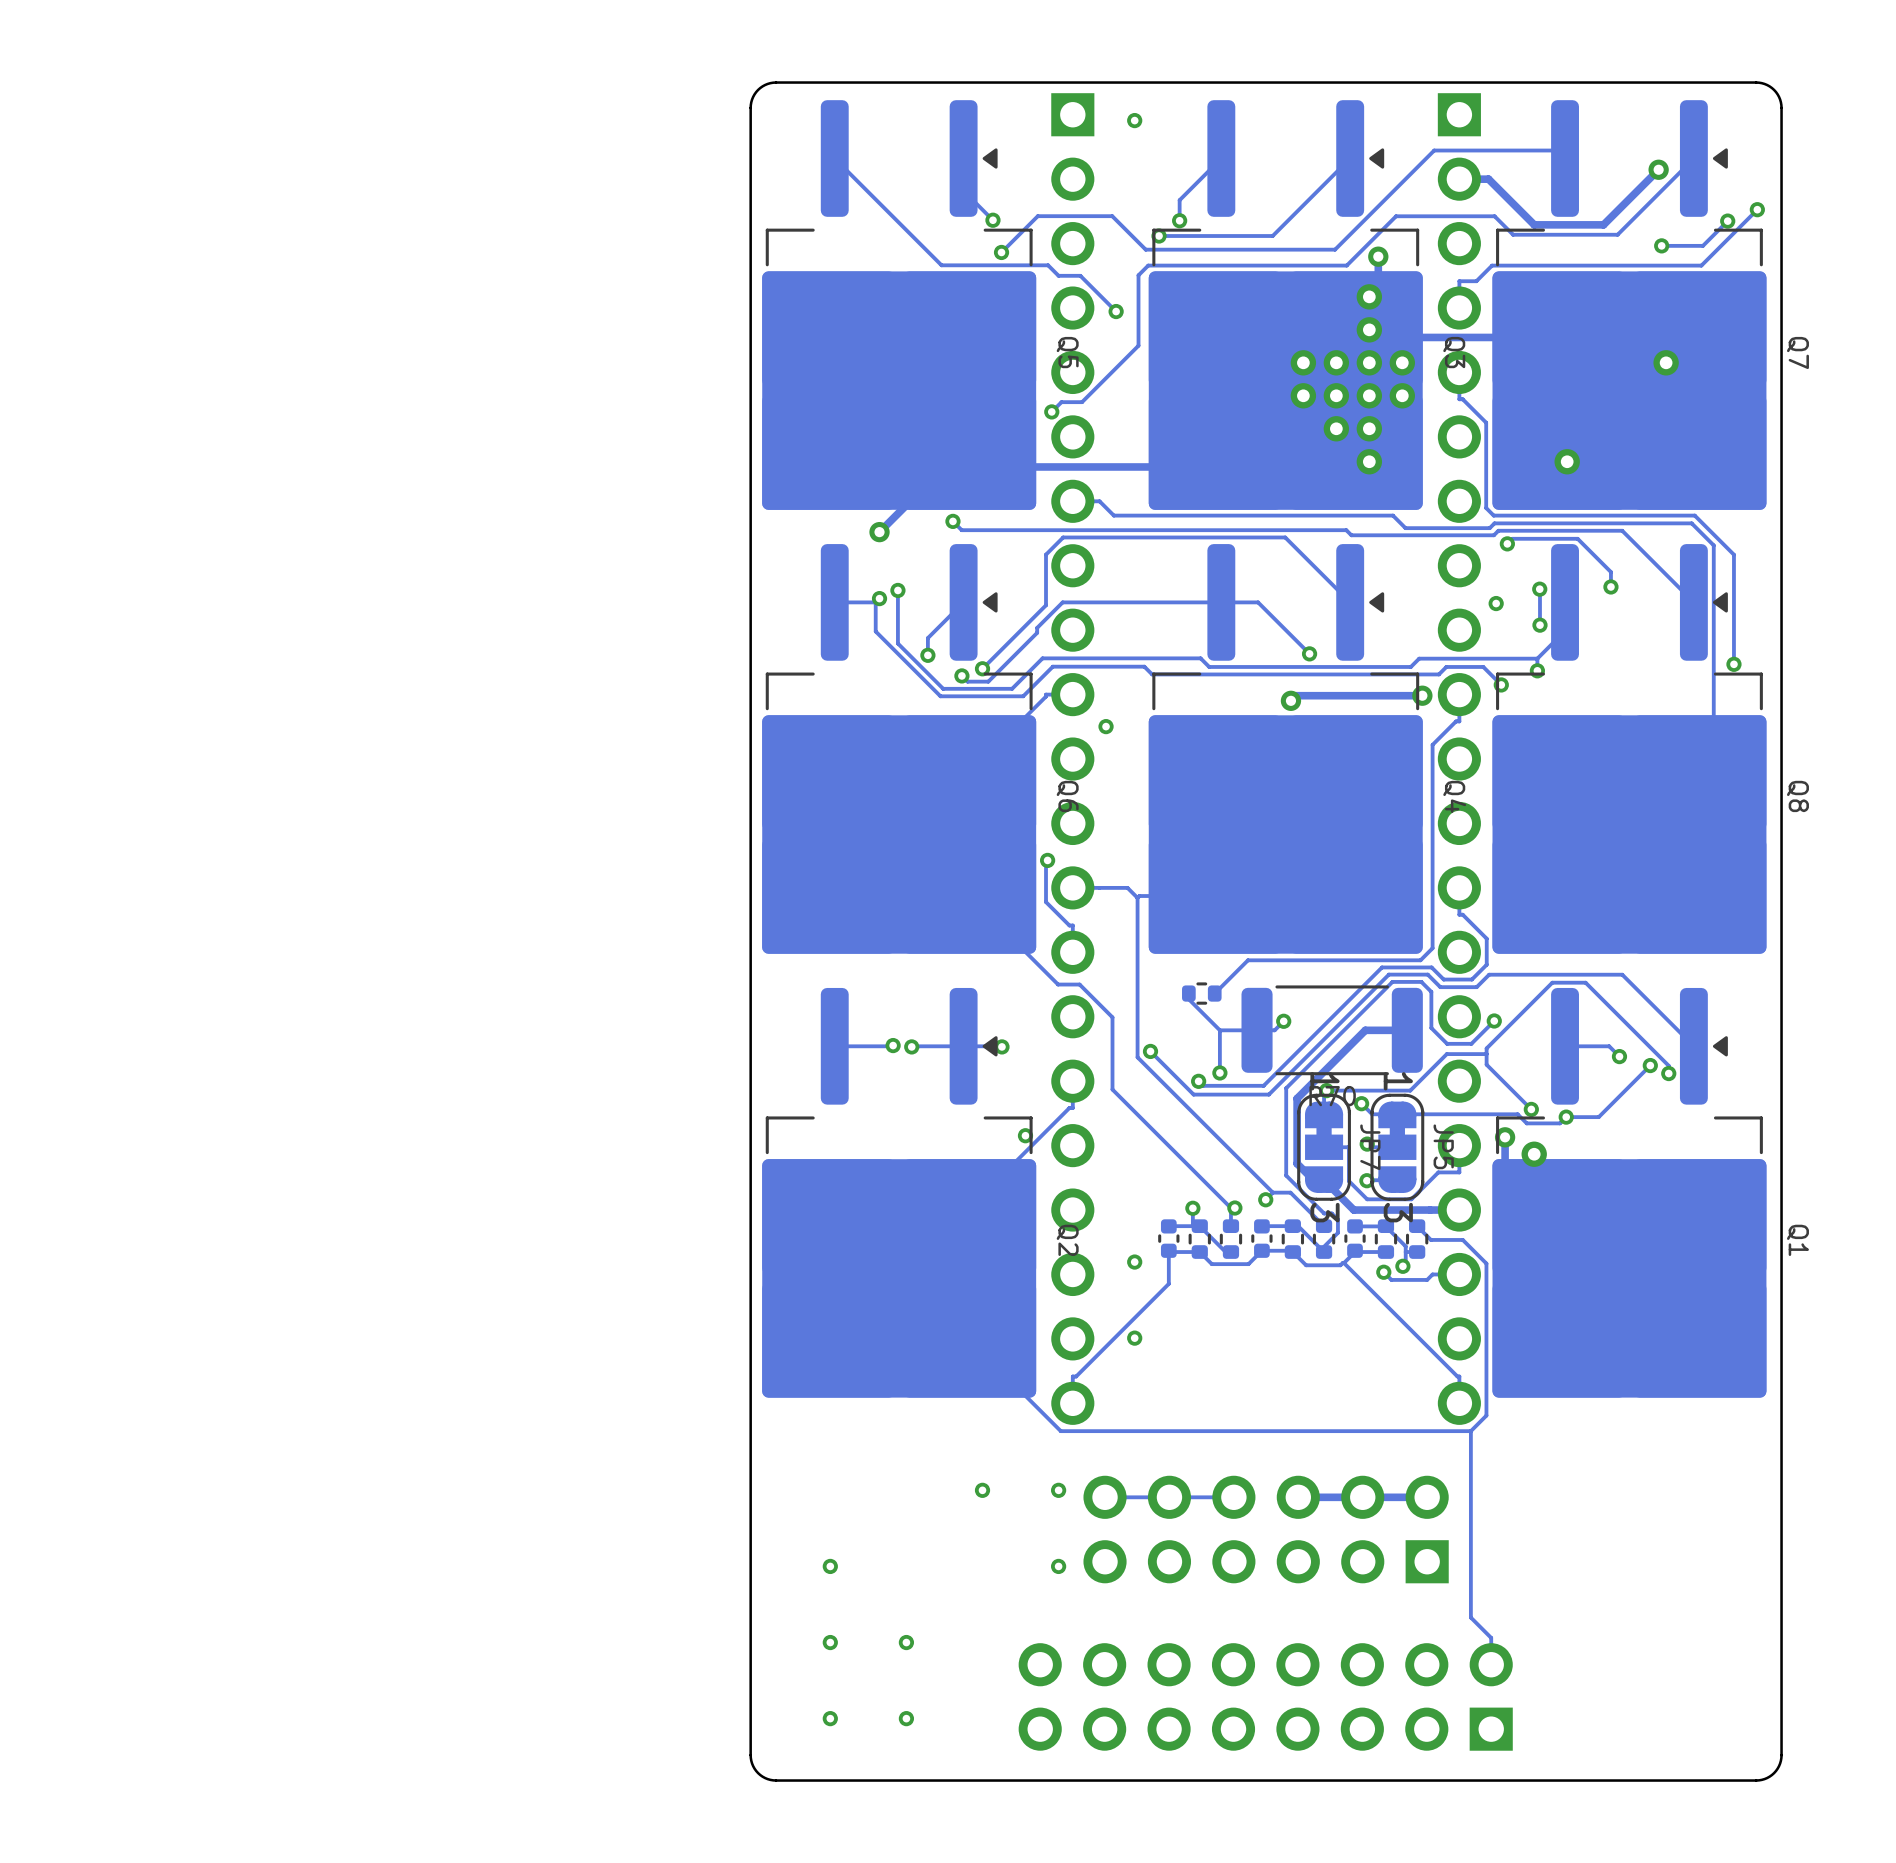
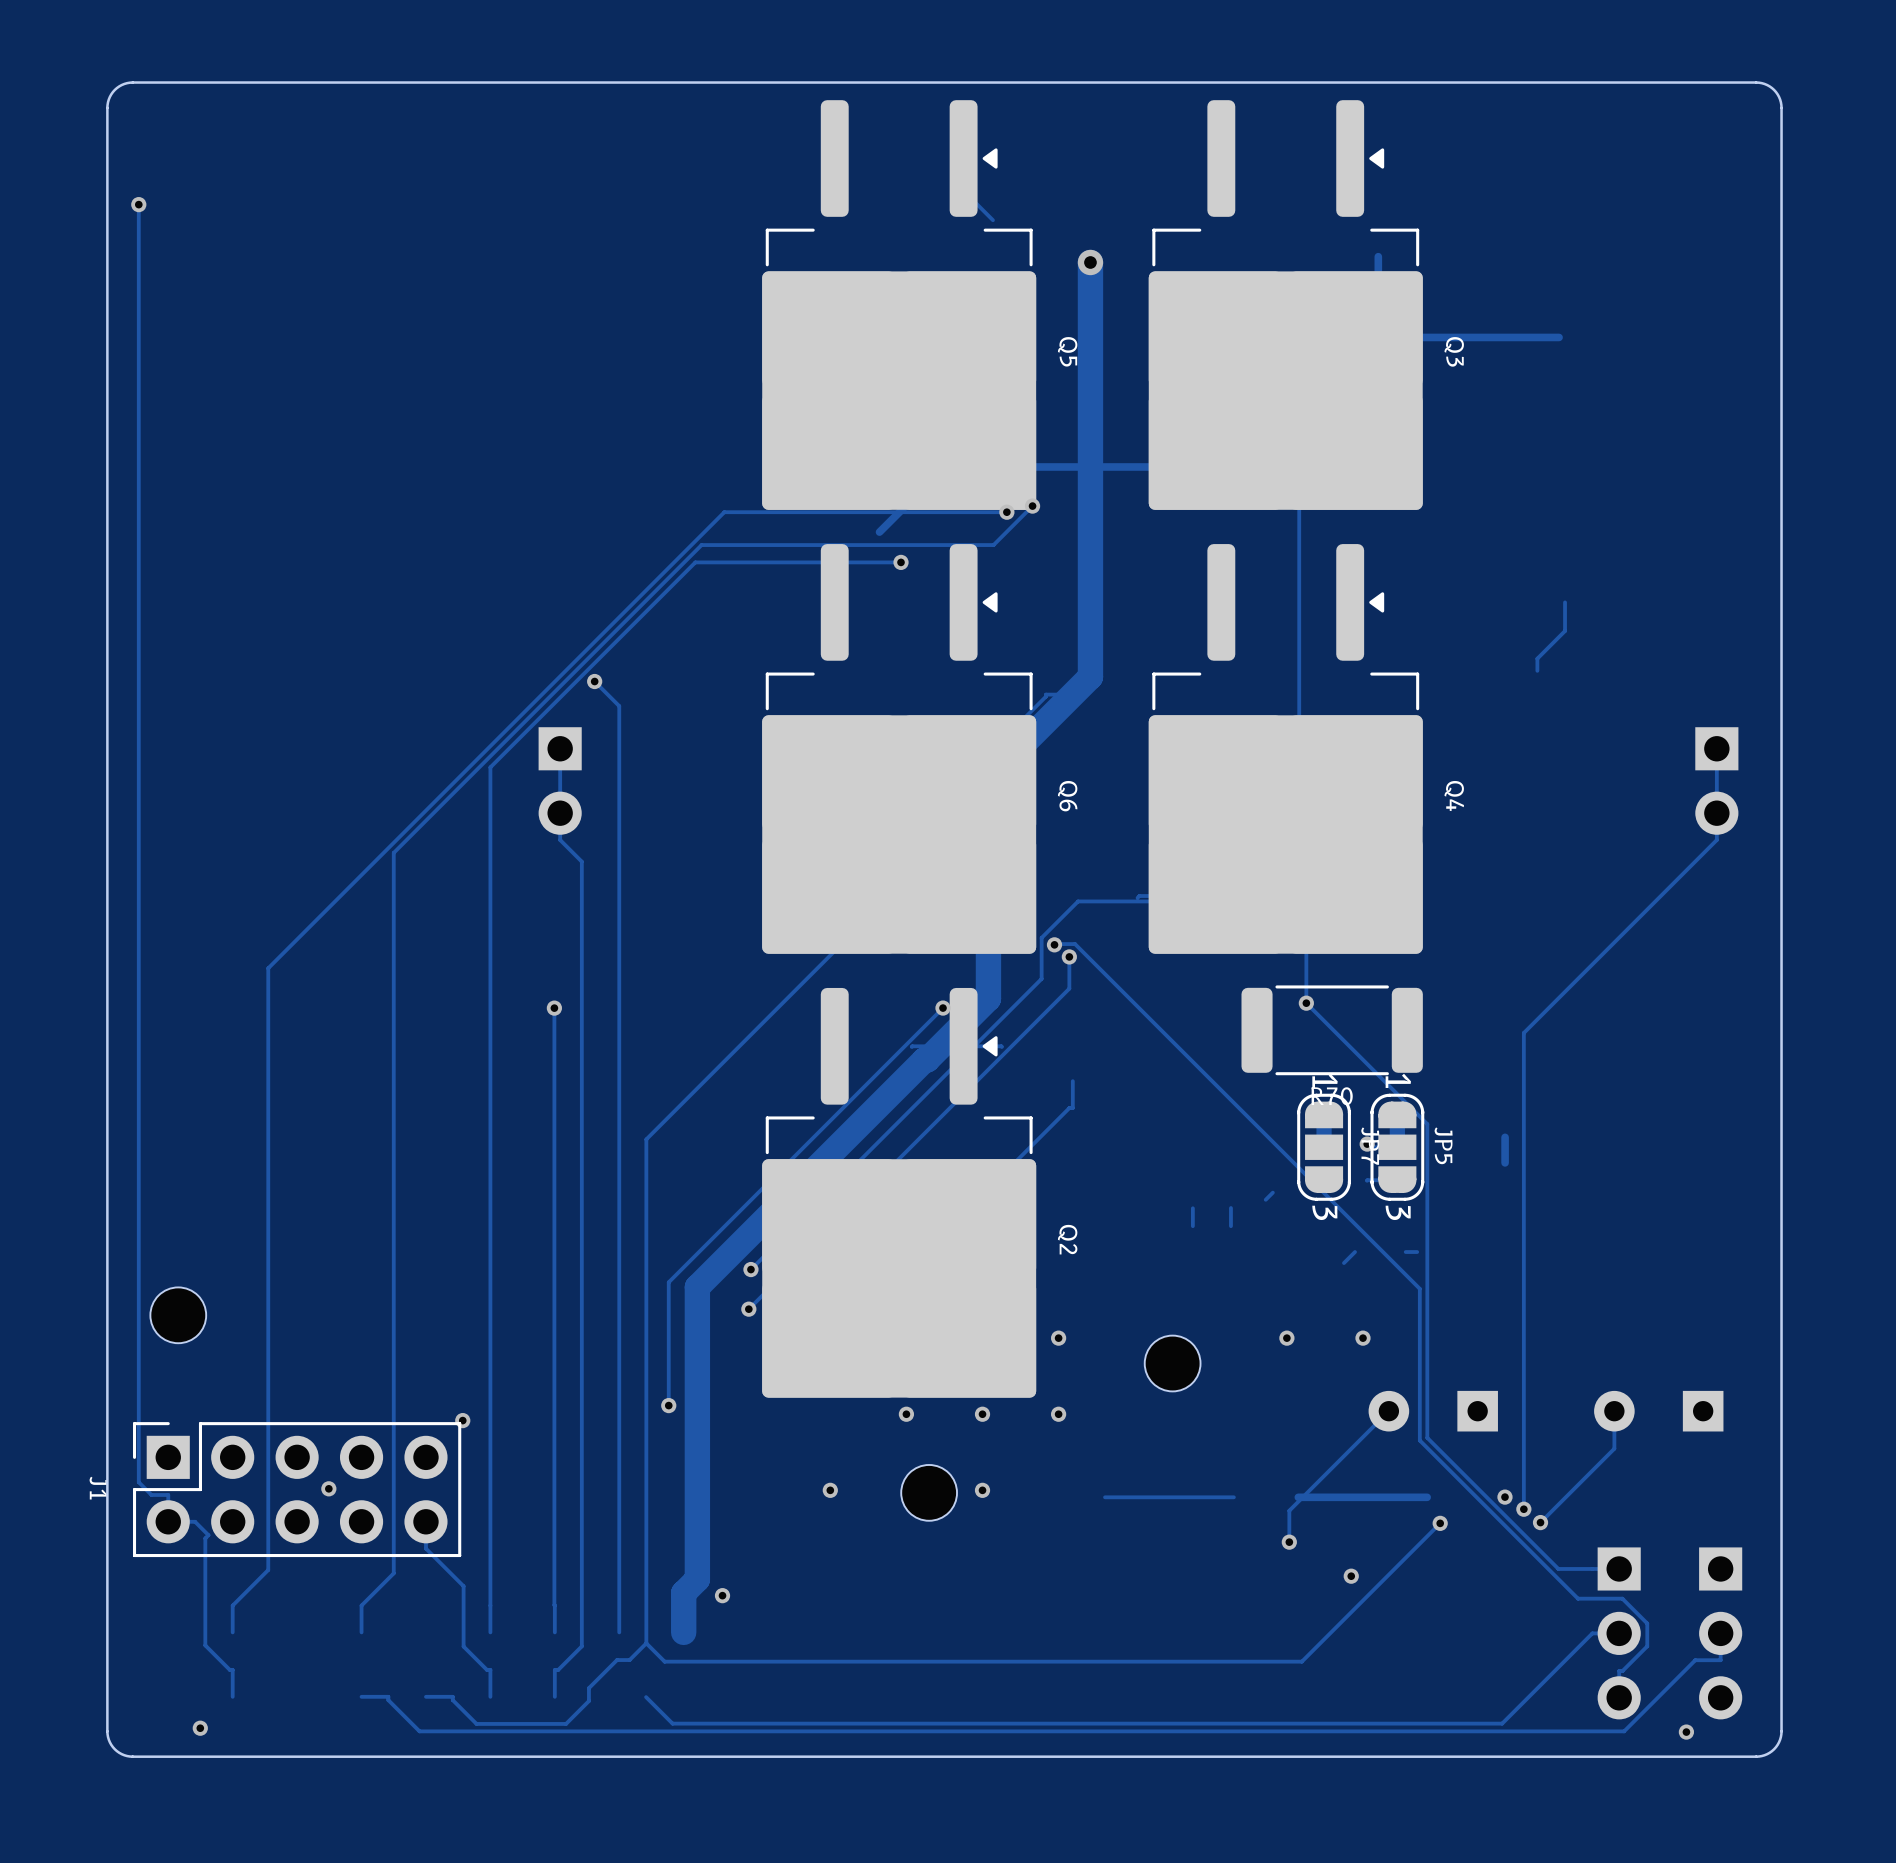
board edge: (776, 82) (767, 83) (758, 89) (752, 99) (750, 107) (750, 1755) (754, 1768) (762, 1776) (776, 1780) (1756, 1780) (1769, 1776) (1779, 1766) (1781, 1758) (1781, 1731) -> (776, 82) (132, 82) (116, 88) (108, 99) (107, 1731) (111, 1744) (119, 1752) (132, 1756) (1756, 1756) (1764, 1755) (1774, 1749) (1779, 1742) (1781, 1731)
via: (1134, 120) -> none
track: (834, 158) (941, 265) (1048, 265) (1058, 275) (1080, 275) (1116, 311) -> none
track: (1221, 158) (1179, 200) (1179, 220) -> none
track: (1350, 158) (1272, 236) (1159, 236) -> none
track: (1565, 158) (1557, 150) (1434, 150) (1335, 249) (1145, 249) (1112, 216) (1037, 216) (1001, 252) -> none
track: (1693, 158) (1617, 234) (1513, 234) (1494, 216) (1396, 216) (1346, 265) (1148, 265) (1138, 275) (1138, 345) (1082, 402) (1061, 402) (1051, 411) -> none
track: (1658, 169) (1603, 224) (1534, 224) (1488, 179) (1459, 179) -> none
via: (1658, 169) -> none
track: none -> (138, 204) (138, 1482) (151, 1494) (168, 1494) (168, 1521) (195, 1521) (208, 1535) (205, 1538) (205, 1645) (229, 1670) (232, 1670) (232, 1696)
via: none -> (138, 204)
track: (1757, 209) (1701, 265) (1492, 265) (1476, 281) (1459, 281) (1459, 308) -> none
via: (1757, 209) -> none
via: (992, 220) -> none
via: (1179, 220) -> none
track: (1727, 221) (1702, 245) (1661, 245) -> none
via: (1727, 221) -> none
via: (1159, 236) -> none
via: (1661, 245) -> none
via: (1001, 252) -> none
via: (1378, 256) -> none
track: none -> (1090, 262) (1090, 676) (988, 778) (988, 998) (697, 1287) (697, 1579) (683, 1593) (683, 1632)
via: none -> (1090, 262)
via: (1369, 296) -> none
Q7: (1629, 304) -> none
via: (1116, 311) -> none
via: (1369, 329) -> none
via: (1303, 362) -> none
via: (1336, 362) -> none
via: (1369, 362) -> none
via: (1402, 362) -> none
via: (1666, 362) -> none
track: (1459, 372) (1459, 399) (1462, 399) (1486, 422) (1486, 508) (1493, 515) (1694, 515) (1733, 554) (1733, 664) -> none
via: (1303, 395) -> none
via: (1336, 395) -> none
via: (1369, 395) -> none
via: (1402, 395) -> none
via: (1051, 411) -> none
via: (1336, 428) -> none
via: (1369, 428) -> none
via: (1369, 461) -> none
via: (1567, 461) -> none
track: none -> (1299, 466) (1299, 819) (1306, 826) (1306, 1003) (1427, 1124) (1427, 1437) (1558, 1568) (1619, 1568)
track: (1072, 501) (1099, 501) (1113, 515) (1393, 515) (1405, 528) (1489, 528) (1494, 523) (1691, 523) (1713, 545) (1713, 759) (1638, 834) -> none
track: none -> (1032, 506) (993, 545) (701, 545) (393, 852) (393, 1573) (361, 1605) (361, 1632)
via: none -> (1032, 506)
track: none -> (1006, 512) (724, 512) (268, 968) (268, 1570) (232, 1605) (232, 1632)
via: none -> (1006, 512)
track: (952, 521) (961, 530) (1346, 530) (1351, 535) (1493, 535) (1498, 530) (1622, 530) (1693, 602) -> none
via: (952, 521) -> none
via: (879, 532) -> none
track: (1507, 543) (1512, 538) (1577, 538) (1610, 572) (1610, 586) -> none
via: (1507, 543) -> none
track: none -> (901, 562) (695, 562) (490, 767) (490, 1632)
via: none -> (901, 562)
via: (1610, 586) -> none
track: (1539, 589) (1539, 625) -> none
via: (1539, 589) -> none
track: (897, 590) (897, 643) (943, 688) (1012, 688) (1042, 658) (1200, 658) (1209, 666) (1410, 666) (1419, 658) (1537, 658) -> none
via: (897, 590) -> none
via: (879, 598) -> none
track: (875, 602) (834, 602) -> none
track: (875, 602) (875, 631) (940, 696) (1023, 696) (1052, 666) (1144, 666) (1152, 674) (1438, 674) (1446, 666) (1483, 666) (1501, 684) -> none
track: (963, 602) (927, 638) (927, 655) -> none
track: (1350, 602) (1285, 537) (1063, 537) (1046, 554) (1046, 605) (982, 668) -> none
via: (1496, 603) -> none
via: (1539, 625) -> none
track: (1309, 653) (1258, 602) (1062, 602) (1037, 627) (1037, 632) (988, 681) (967, 681) (961, 675) -> none
via: (1309, 653) -> none
via: (927, 655) -> none
via: (1733, 664) -> none
via: (982, 668) -> none
via: (1537, 670) -> none
via: (961, 675) -> none
track: none -> (594, 681) (619, 706) (619, 1632)
via: none -> (594, 681)
via: (1501, 684) -> none
track: (1459, 694) (1459, 721) (1456, 721) (1432, 744) (1432, 948) (1420, 960) (1247, 960) (1214, 993) -> none
track: (1422, 695) (1296, 695) (1290, 700) -> none
via: (1422, 695) -> none
via: (1290, 700) -> none
via: (1106, 726) -> none
track: none -> (560, 748) (560, 840) (581, 861) (581, 1646) (558, 1670) (554, 1670) (554, 1696)
track: none -> (945, 748) (945, 840) (646, 1139) (646, 1643)
Q8: (1629, 748) -> none
track: none -> (1716, 748) (1716, 840) (1523, 1033) (1523, 1509)
part: (1072, 759) -> none
part: (1459, 759) -> none
part: none -> (560, 780)
part: none -> (1716, 780)
track: (890, 834) (908, 834) (1058, 984) (1079, 984) (1112, 1017) (1112, 1089) (1230, 1208) (1234, 1208) -> none
track: (1047, 860) (1046, 862) (1046, 902) (1069, 925) (1072, 925) (1072, 952) -> none
via: (1047, 860) -> none
track: (1072, 887) (1127, 887) (1137, 897) (1137, 1057) (1272, 1192) (1290, 1192) (1324, 1226) -> none
track: (1459, 887) (1459, 914) (1462, 914) (1486, 938) (1486, 964) (1471, 979) (1443, 979) (1431, 967) (1382, 967) (1263, 1085) (1203, 1085) (1198, 1081) -> none
track: none -> (1292, 901) (1078, 901) (1041, 937) (1041, 978) (750, 1269)
track: none -> (1054, 944) (1075, 944) (1419, 1288) (1419, 1440) (1578, 1598) (1622, 1598) (1647, 1623) (1647, 1646) (1622, 1671) (1619, 1671) (1619, 1697)
via: none -> (1054, 944)
track: none -> (1069, 956) (1069, 988) (748, 1309)
via: none -> (1069, 956)
track: (1188, 993) (1188, 999) (1219, 1030) -> none
part: (1201, 993) -> none
track: none -> (554, 1008) (554, 1632)
via: none -> (554, 1008)
track: none -> (942, 1008) (668, 1282) (668, 1405)
via: none -> (942, 1008)
track: (1494, 1020) (1471, 1043) (1447, 1043) (1431, 1028) (1431, 991) (1421, 981) (1392, 981) (1286, 1088) (1286, 1175) (1324, 1213) (1331, 1213) (1337, 1219) (1337, 1232) (1321, 1249) -> none
via: (1494, 1020) -> none
track: (1283, 1021) (1274, 1030) (1219, 1030) -> none
via position: (1283, 1021) -> (1306, 1003)
track: (1219, 1030) (1219, 1072) -> none
track: (1407, 1030) (1365, 1030) (1297, 1098) (1297, 1163) (1313, 1180) (1324, 1180) (1353, 1210) (1459, 1210) -> none
track: (893, 1045) (834, 1046) -> none
via: (893, 1045) -> none
via: (911, 1046) -> none
via: (1001, 1046) -> none
track: (1565, 1046) (1609, 1046) (1619, 1056) -> none
track: (1693, 1046) (1622, 974) (1489, 974) (1476, 987) (1440, 987) (1427, 974) (1388, 974) (1268, 1094) (1193, 1094) (1150, 1051) -> none
via: (1150, 1051) -> none
track: (1486, 1054) (1446, 1054) (1410, 1090) (1326, 1090) (1324, 1093) (1324, 1114) -> none
via: (1619, 1056) -> none
track: (1650, 1065) (1598, 1117) (1566, 1117) (1559, 1123) (1526, 1123) (1517, 1114) (1372, 1114) (1361, 1103) -> none
via: (1650, 1065) -> none
via: (1219, 1072) -> none
track: (1668, 1073) (1668, 1065) (1585, 982) (1552, 982) (1486, 1048) (1486, 1064) (1531, 1109) -> none
via: (1668, 1073) -> none
via: (1198, 1081) -> none
via: (1326, 1090) -> none
via: (1361, 1103) -> none
via: (1531, 1109) -> none
via: (1566, 1117) -> none
via: (1025, 1135) -> none
via: (1505, 1137) -> none
track: (1459, 1145) (1459, 1172) (1438, 1172) (1411, 1199) (1367, 1199) (1348, 1181) (1348, 1147) (1324, 1147) -> none
via: (1534, 1154) -> none
via: (1366, 1180) -> none
Q1: (1629, 1192) -> none
via: (1265, 1199) -> none
via: (1192, 1208) -> none
via: (1234, 1208) -> none
track: (1169, 1226) (1199, 1226) (1225, 1252) (1230, 1252) -> none
track: (1262, 1226) (1298, 1226) (1324, 1252) -> none
track: (1355, 1226) (1385, 1226) (1405, 1246) (1405, 1263) (1402, 1266) -> none
track: (1417, 1226) (1430, 1239) (1462, 1239) (1486, 1263) (1486, 1415) (1470, 1431) -> none
part: (1168, 1238) -> none
part: (1261, 1238) -> none
part: (1355, 1238) -> none
part: (1199, 1239) -> none
part: (1230, 1239) -> none
part: (1292, 1239) -> none
part: (1324, 1239) -> none
part: (1385, 1239) -> none
part: (1417, 1239) -> none
track: (1168, 1250) (1168, 1283) (1076, 1376) (1072, 1376) (1072, 1403) -> none
track: (1355, 1250) (1385, 1252) -> none
track: (1168, 1252) (1199, 1252) (1211, 1264) (1248, 1264) (1261, 1250) (1291, 1250) (1306, 1265) (1340, 1265) (1343, 1263) (1459, 1376) (1459, 1403) -> none
via: (1134, 1262) -> none
via: (1402, 1266) -> none
via: none -> (750, 1269)
track: (1383, 1272) (1391, 1279) (1427, 1279) (1432, 1274) (1459, 1274) -> none
via: (1383, 1272) -> none
track: (890, 1278) (908, 1278) (1060, 1431) (1470, 1431) -> none
via: none -> (748, 1309)
part: none -> (178, 1315)
via: none -> (1058, 1338)
via: (1134, 1338) -> none
via: none -> (1286, 1338)
via: none -> (1363, 1338)
part: none -> (1172, 1363)
via: none -> (668, 1405)
track: none -> (1388, 1411) (1289, 1510) (1289, 1542)
part: none -> (1433, 1411)
track: none -> (1614, 1411) (1614, 1448) (1540, 1522)
part: none -> (1658, 1411)
via: none -> (906, 1414)
via: none -> (982, 1414)
via: none -> (1058, 1414)
via: none -> (462, 1420)
track: (1470, 1431) (1470, 1617) (1491, 1637) (1491, 1664) -> none
via: none -> (328, 1488)
J1: none -> (297, 1489)
via: none -> (830, 1490)
via: (1058, 1490) -> none
part: none -> (929, 1492)
via: none -> (1504, 1497)
via: none -> (1523, 1509)
track: none -> (425, 1521) (425, 1548) (463, 1586) (463, 1646) (487, 1670) (490, 1670) (490, 1696)
via: none -> (1540, 1522)
track: none -> (1440, 1523) (1301, 1661) (664, 1661) (646, 1643)
via: none -> (1440, 1523)
part: (1266, 1529) -> none
via: none -> (1289, 1542)
via: (830, 1566) -> none
via: (1058, 1566) -> none
via: none -> (1351, 1576)
via: none -> (722, 1595)
track: none -> (1619, 1633) (1592, 1633) (1502, 1723) (672, 1723) (646, 1697)
part: none -> (1619, 1633)
track: none -> (1720, 1633) (1720, 1660) (1695, 1660) (1624, 1731) (419, 1731) (388, 1700) (388, 1696) (361, 1696)
part: none -> (1720, 1633)
via: (830, 1642) -> none
via: (906, 1642) -> none
track: none -> (646, 1643) (629, 1660) (617, 1660) (588, 1688) (588, 1701) (566, 1723) (476, 1723) (452, 1700) (452, 1696) (425, 1696)
part: (1265, 1696) -> none
via: (830, 1718) -> none
via: (906, 1718) -> none
via: none -> (200, 1728)
via: none -> (1686, 1732)

